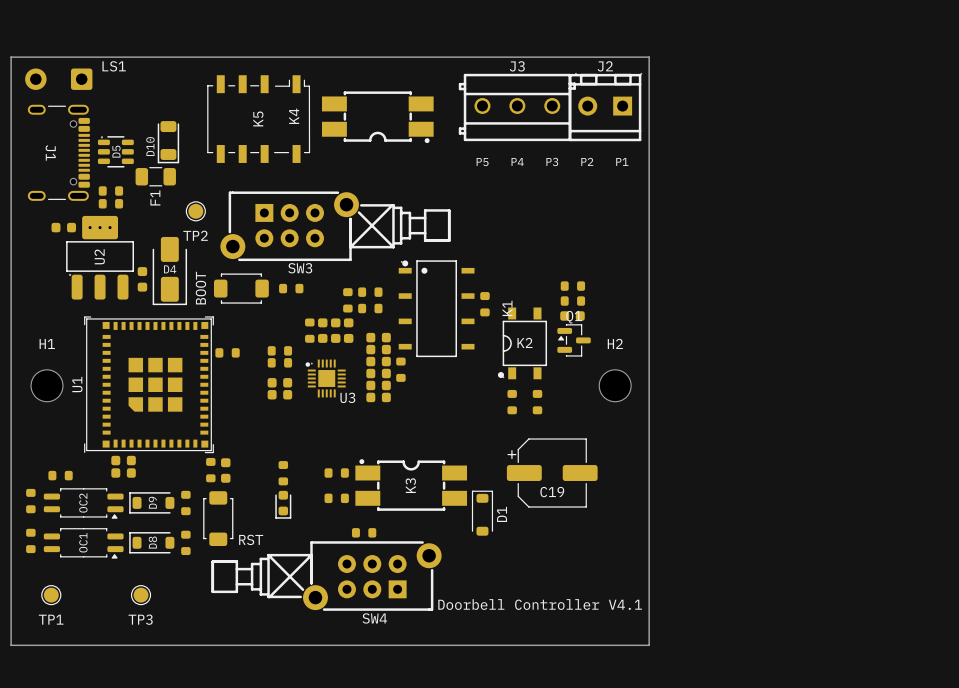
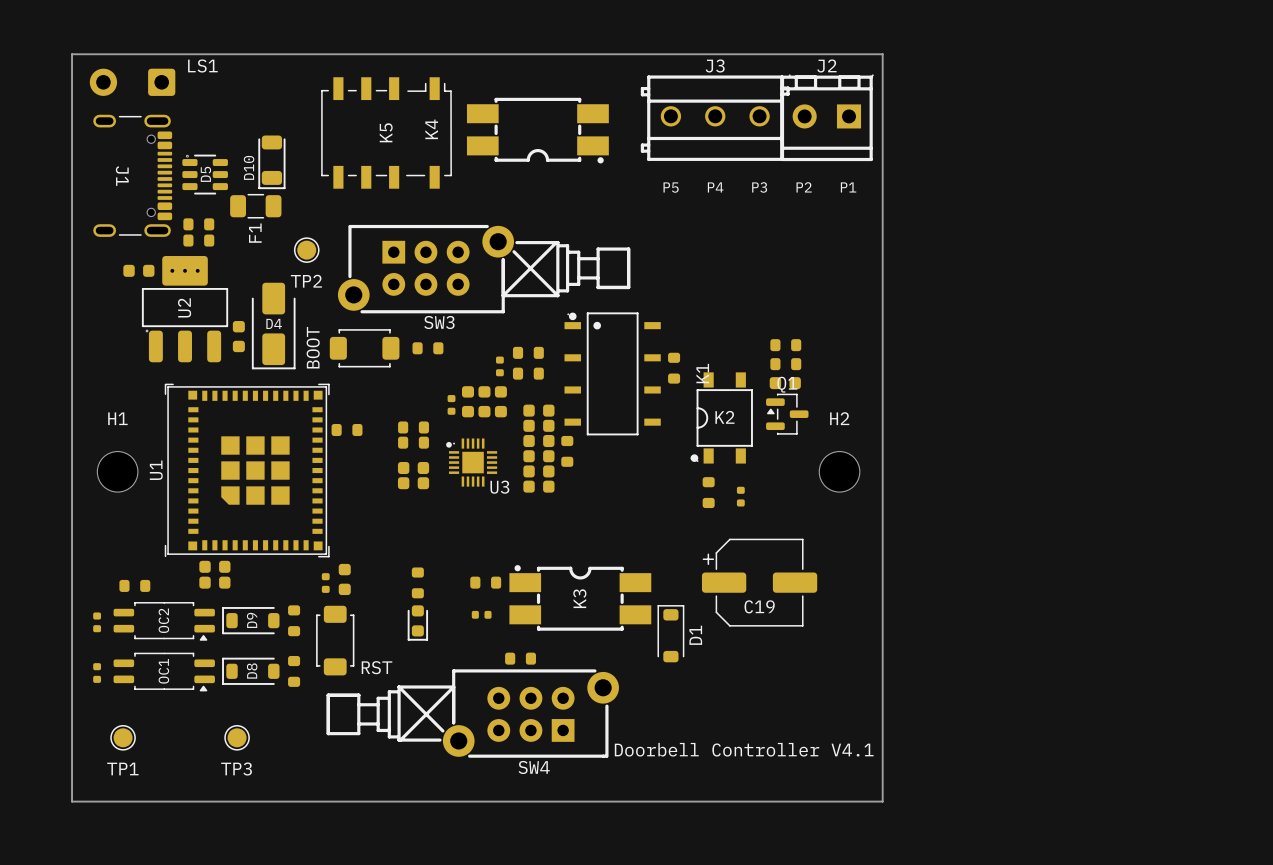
part footprint: [343, 288, 353, 313] -> [495, 356, 504, 377]
part footprint: [305, 318, 315, 343] -> [447, 395, 456, 415]
part footprint: [532, 389, 543, 415] -> [736, 486, 745, 507]
part footprint: [206, 457, 216, 483] -> [321, 573, 330, 593]
part footprint: [26, 488, 36, 514] -> [93, 612, 102, 633]
part footprint: [324, 493, 349, 504] -> [471, 610, 492, 619]
part footprint: [26, 528, 36, 554] -> [93, 663, 102, 683]

